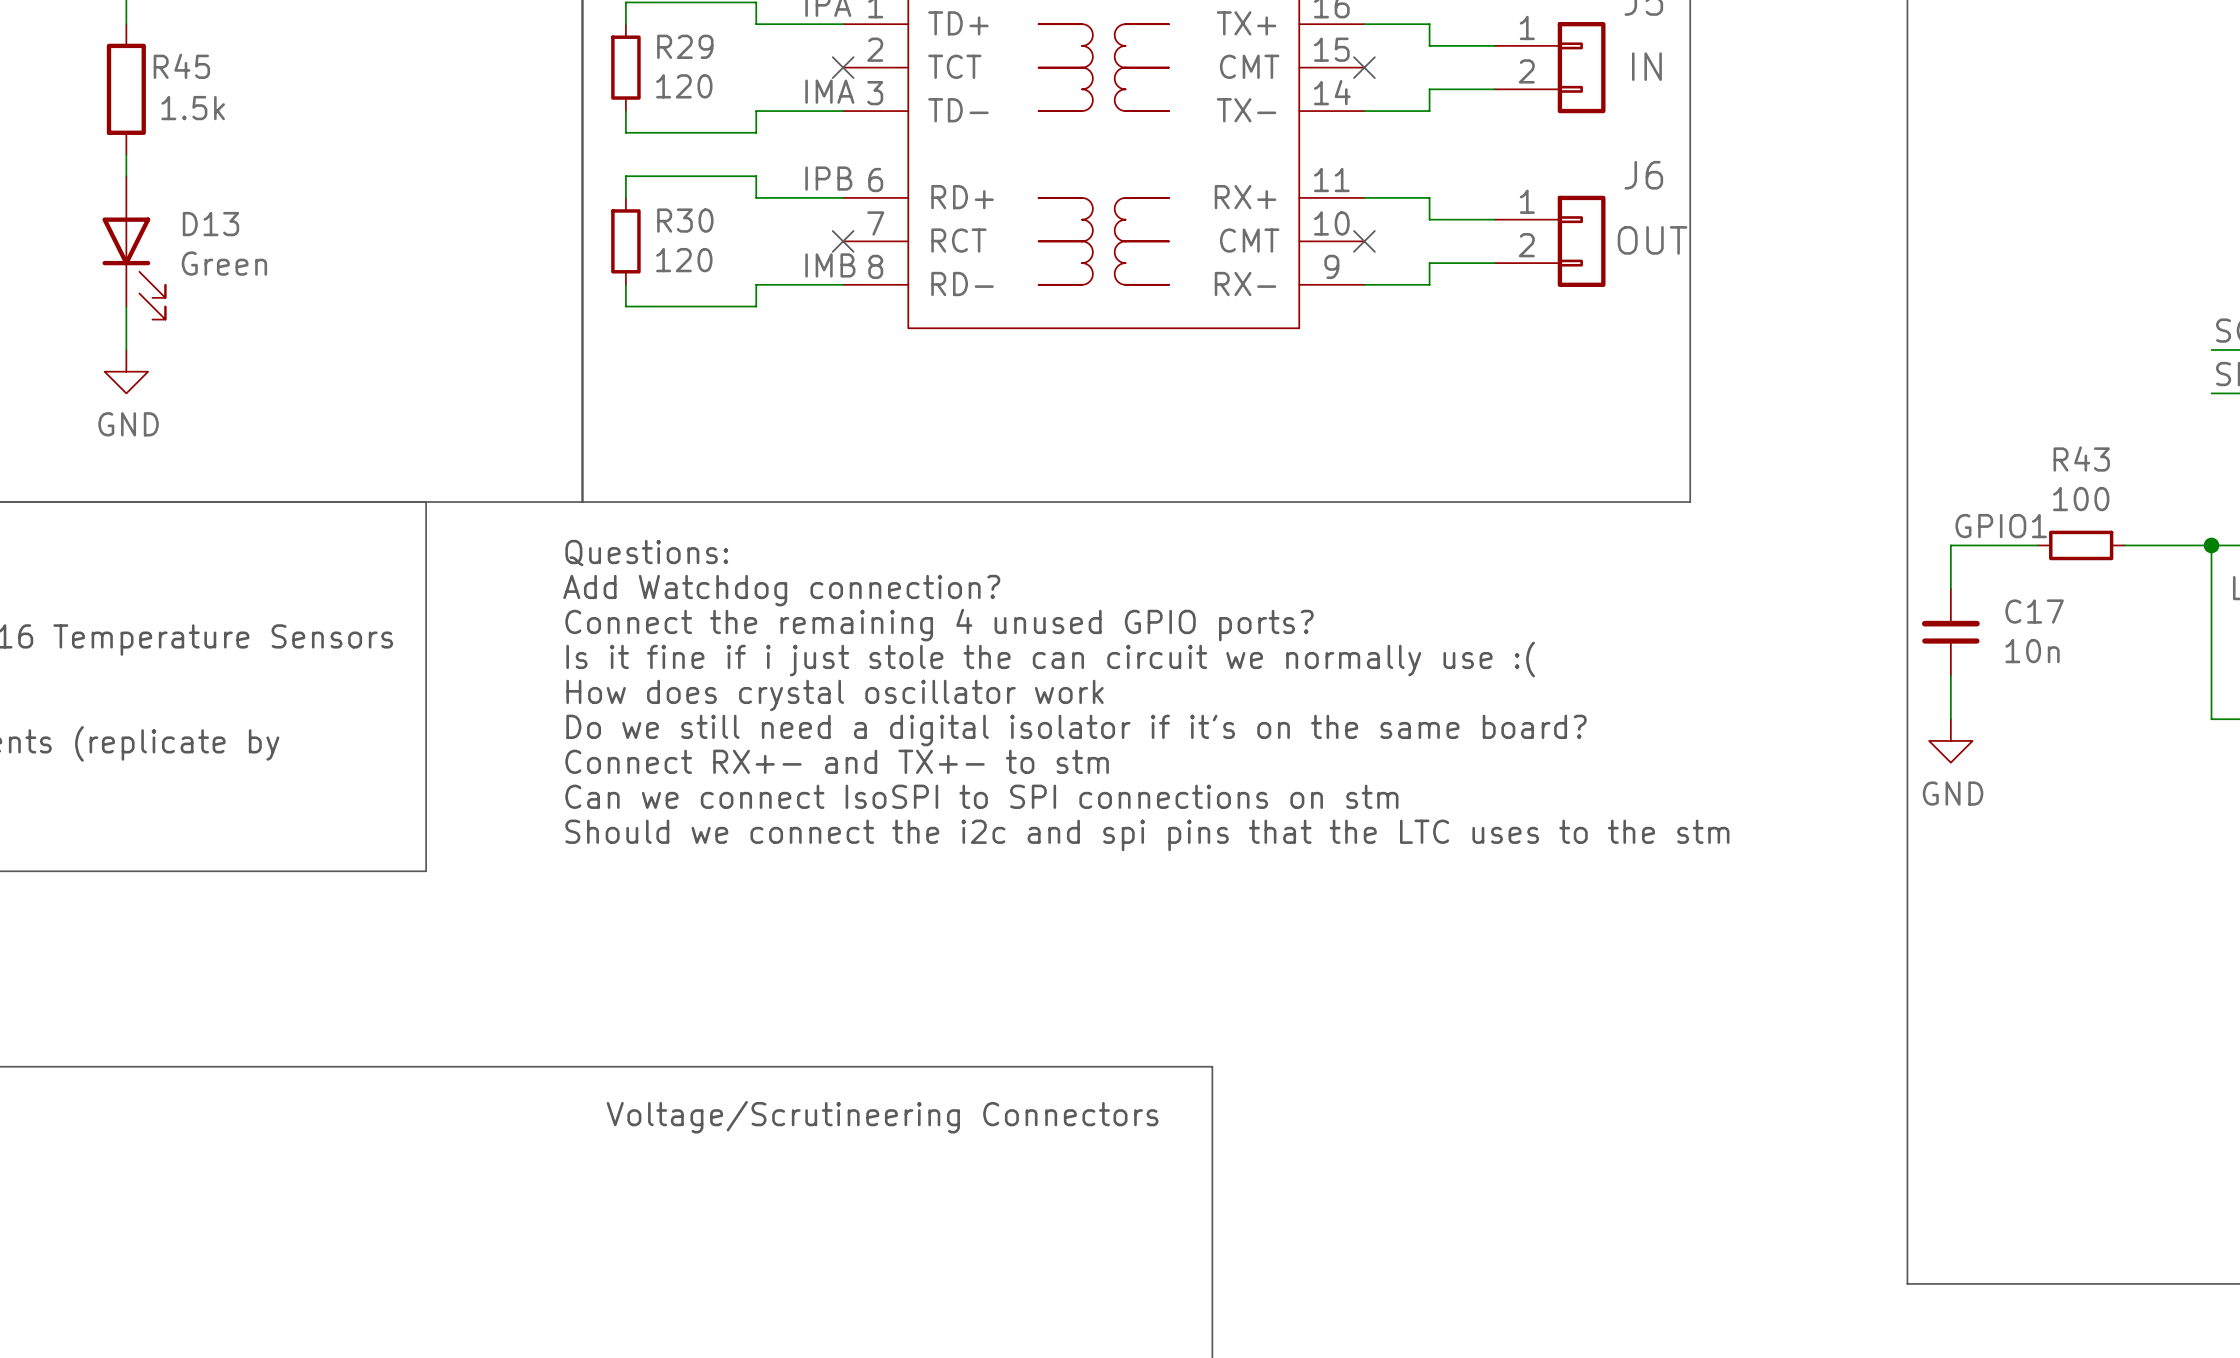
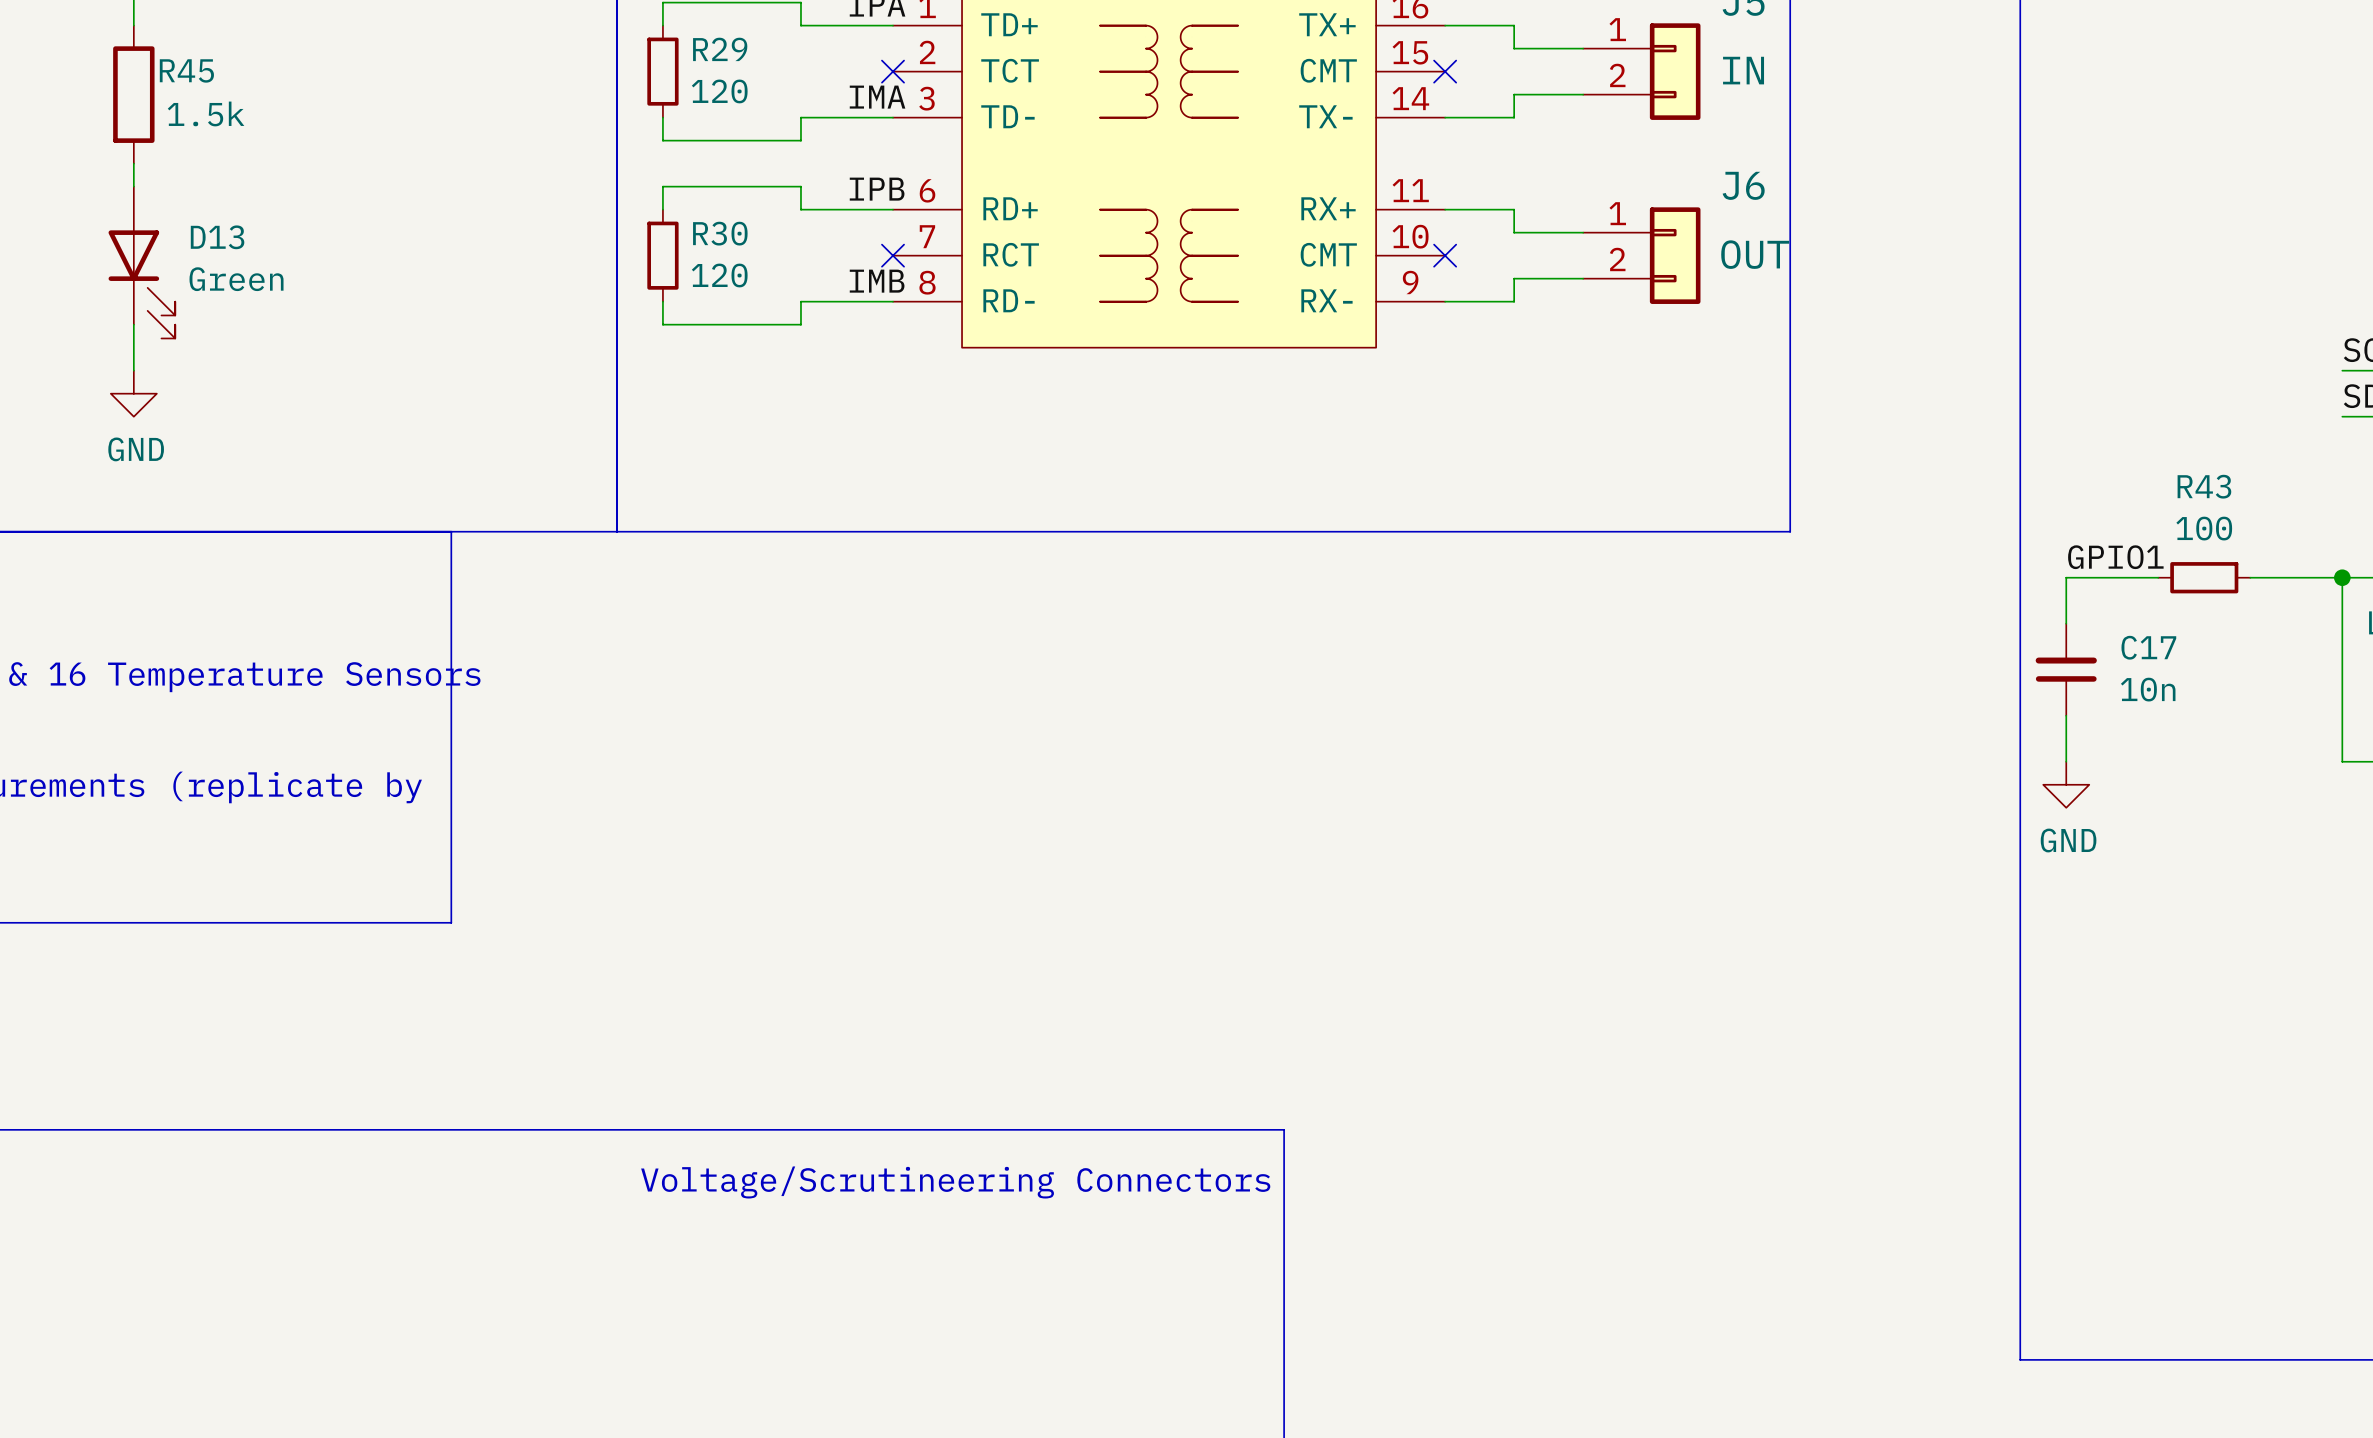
text: Questions: (646, 553) -> none
text: Add Watchdog connection? (781, 590) -> none
text: Connect the remaining 4 unused GPIO ports? (939, 625) -> none
text: Is it fine if i just stole the can circuit we normally use :( (1050, 659) -> none
text: How does crystal oscillator work (835, 695) -> none
text: Do we still need a digital isolator if it's on the same board? (1076, 730) -> none
text: Connect RX+- and TX+- to stm (837, 761) -> none
text: Can we connect IsoSPI to SPI connections on stm (981, 796) -> none
text: Should we connect the i2c and spi pins that the LTC uses to the stm (1147, 835) -> none

